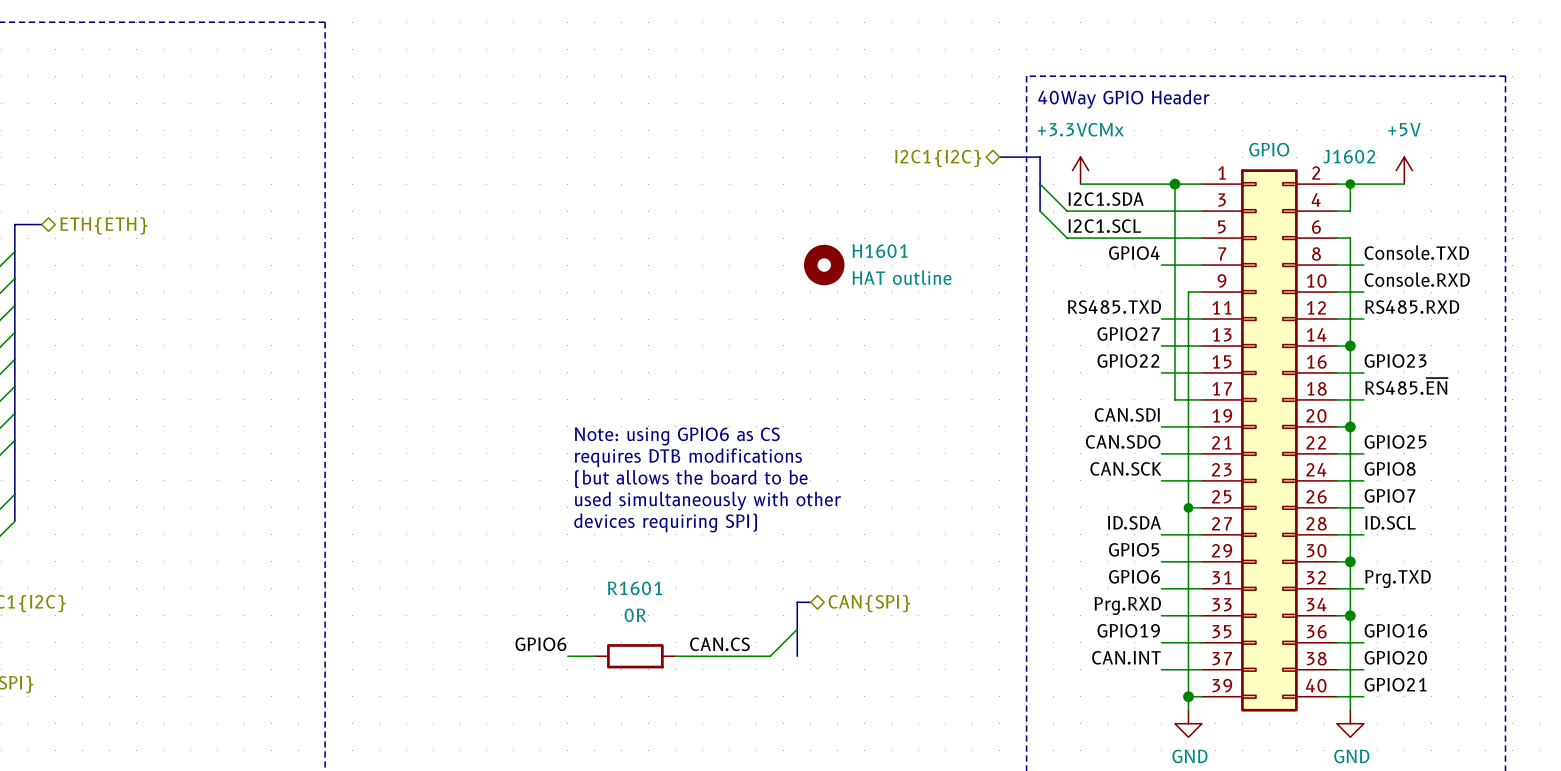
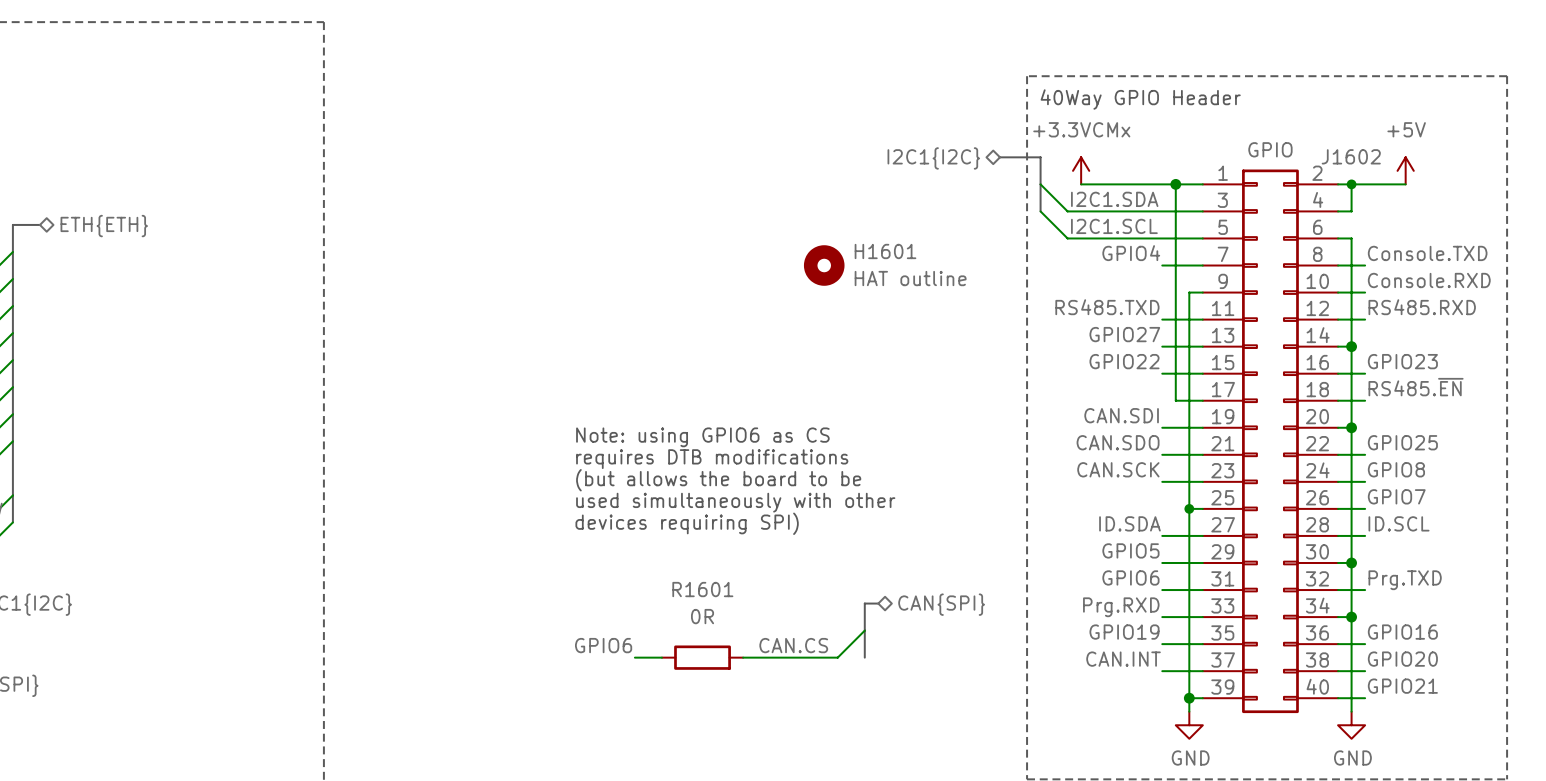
bus: (810, 602) (797, 602) (797, 656) -> (878, 603) (864, 603) (864, 657)
hierarchical label position: CAN{SPI} (869, 603) -> CAN{SPI} (941, 604)
wire: (797, 629) (770, 656) -> (864, 630) (837, 657) (770, 657)
label position: GPIO6 (540, 644) -> GPIO6 (603, 645)
label position: CAN.CS (719, 644) -> CAN.CS (793, 645)
wire: (567, 656) (594, 656) -> (634, 657) (661, 657)
R1601 position: (635, 656) -> (702, 657)
wire: (675, 656) (743, 656) -> none

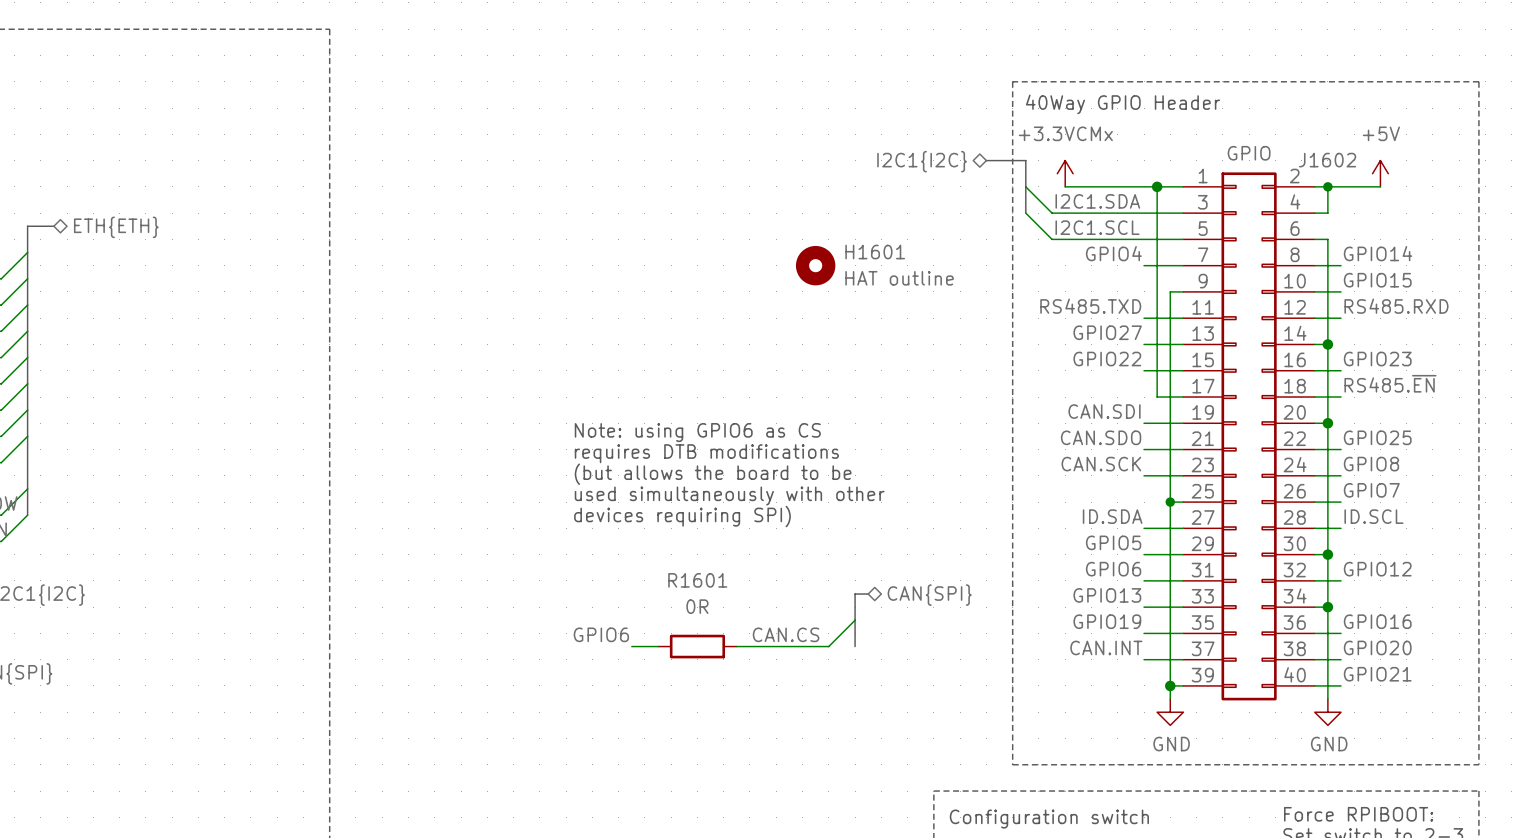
label: Console.TXD (1427, 253) -> GPIO14 (1378, 253)
label: Console.RXD (1429, 280) -> GPIO15 (1377, 280)
label: Prg.TXD (1405, 580) -> GPIO12 (1377, 569)
label: Prg.RXD (1121, 607) -> GPIO13 (1107, 595)

